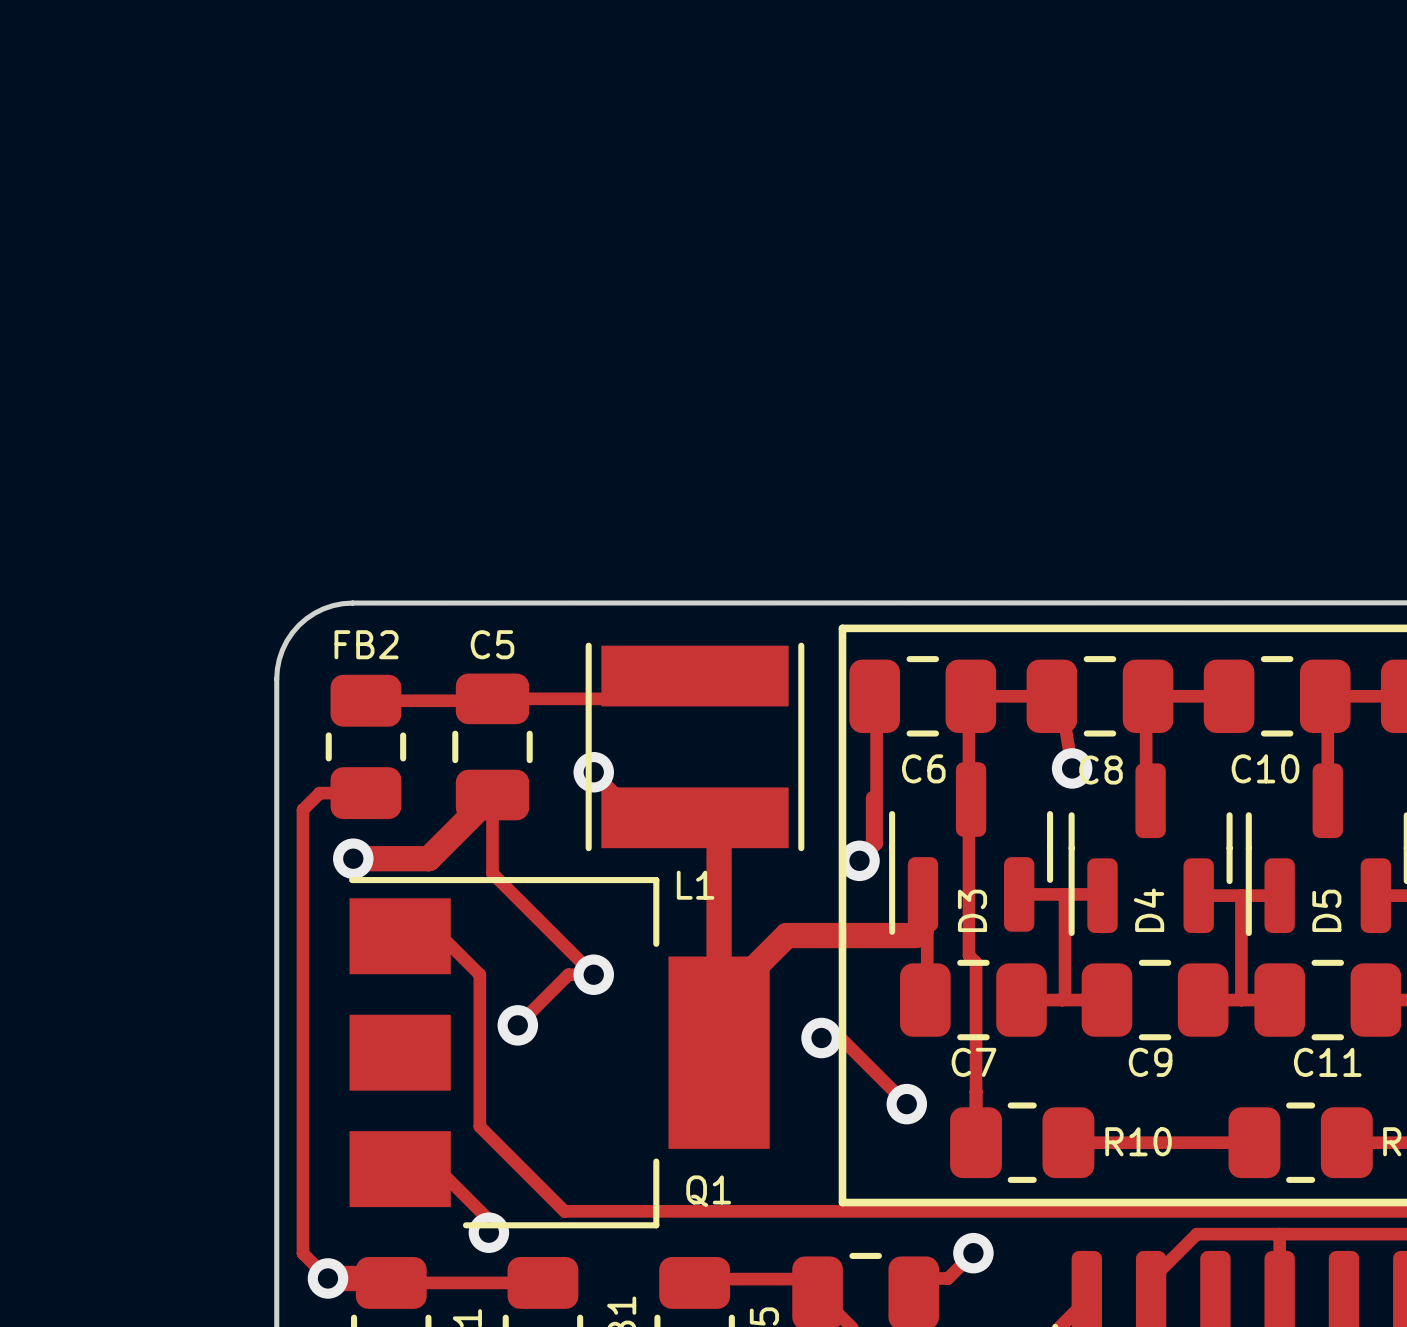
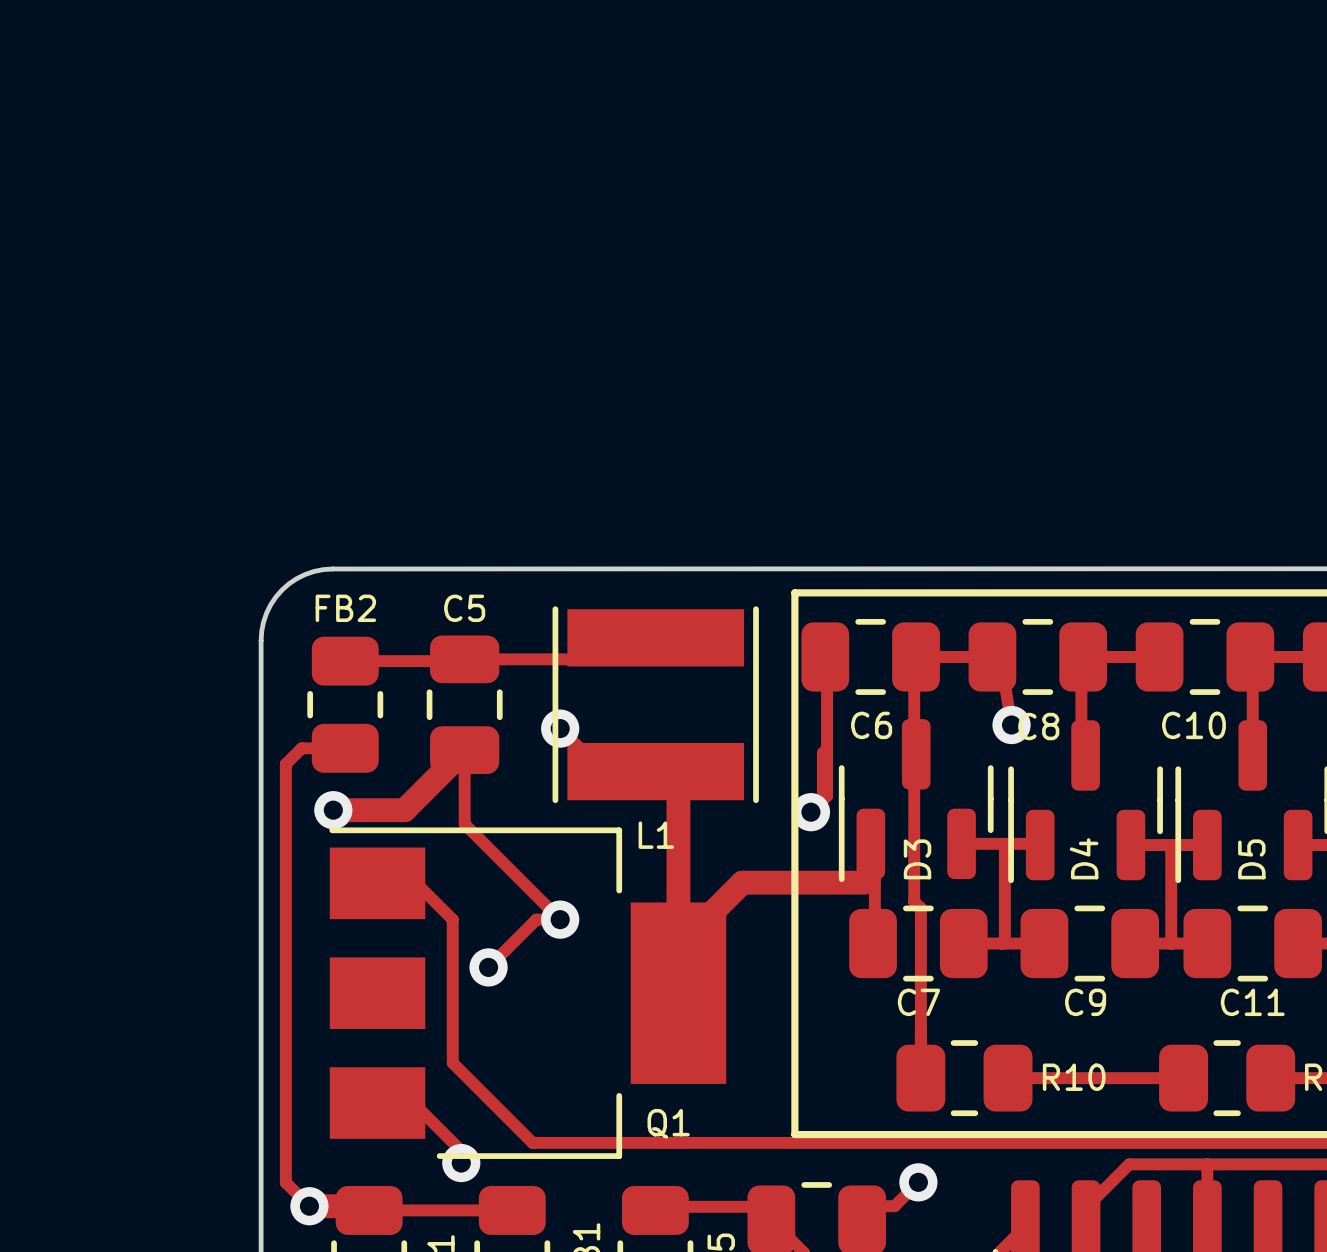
track: (821, 1038) (840, 1038) (906, 1104) -> none
via: (821, 1038) -> none
via: (906, 1104) -> none

